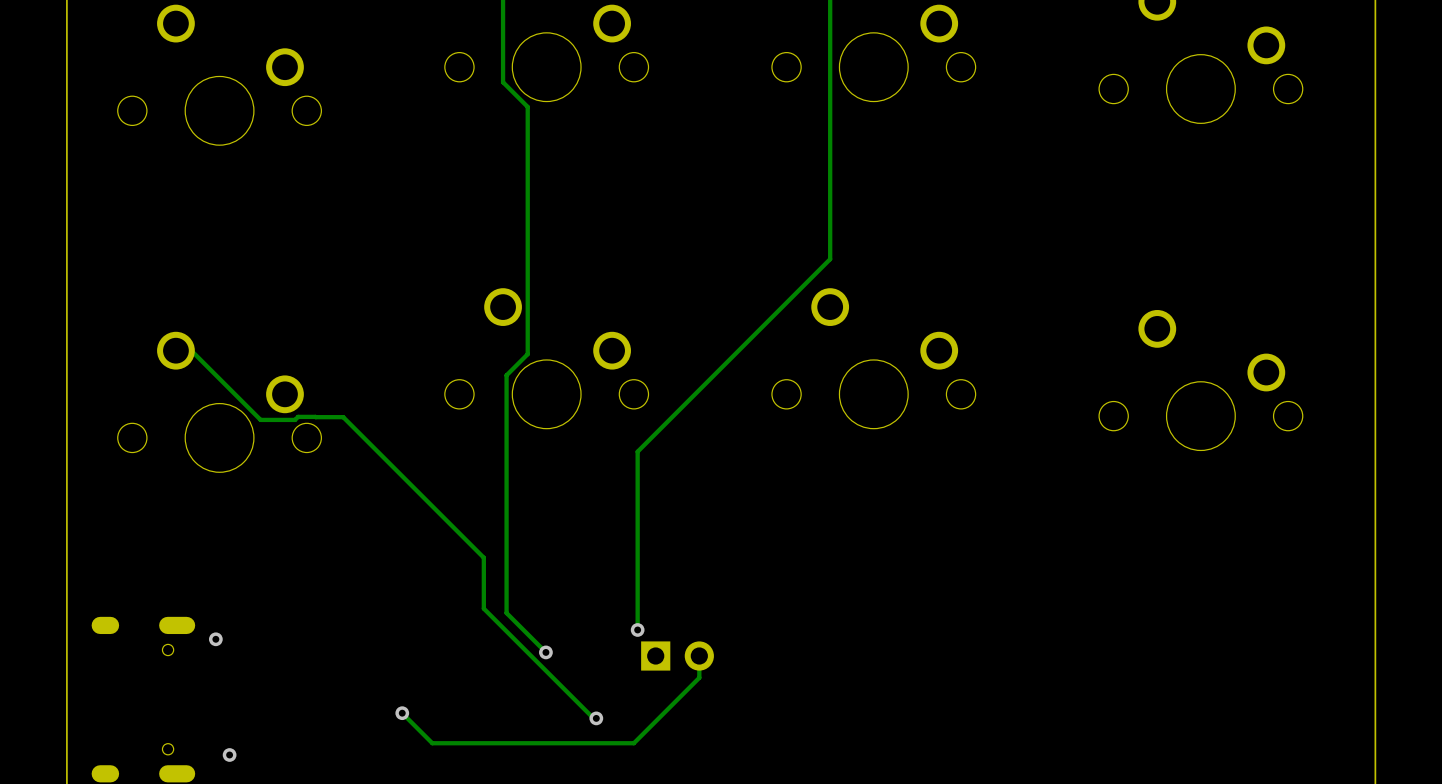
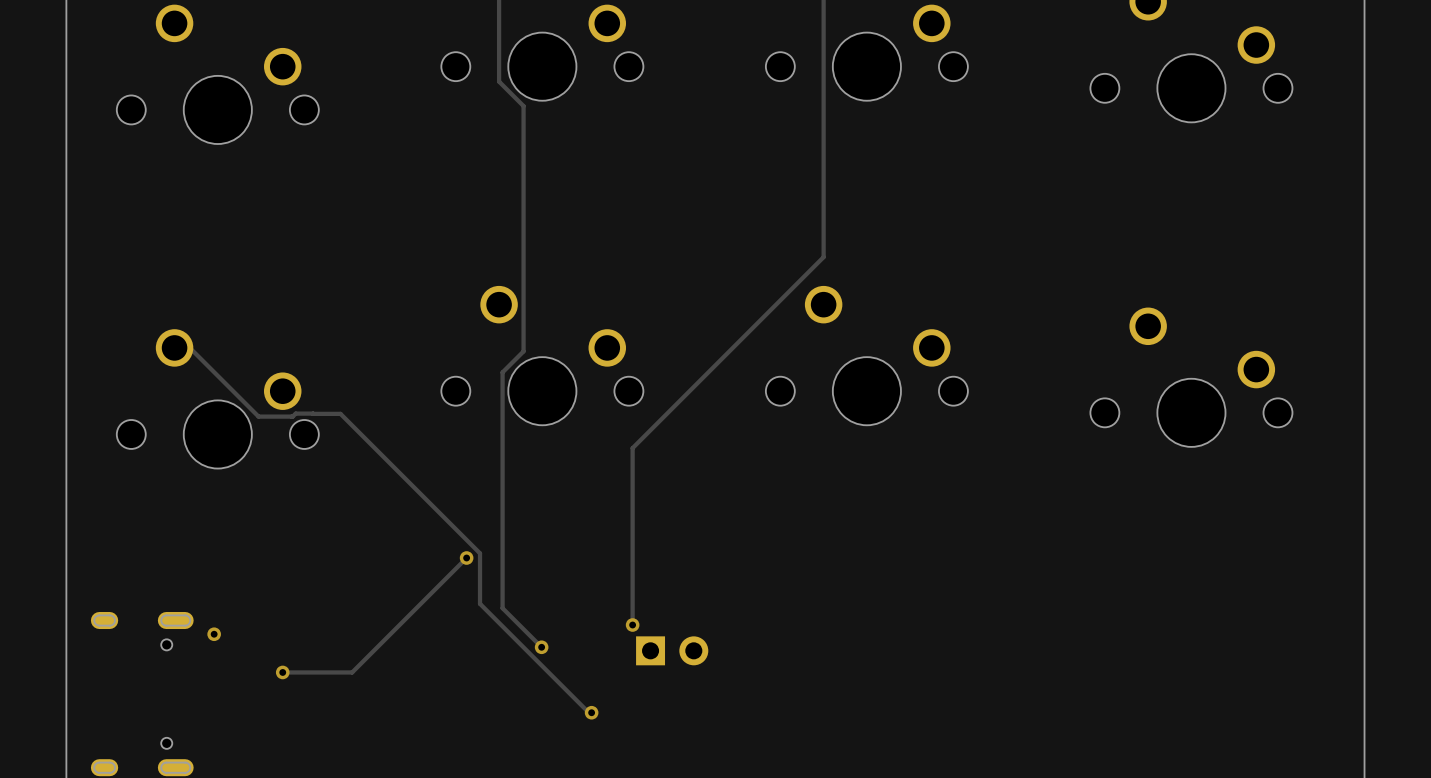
track: none -> (466, 558) (352, 672) (282, 672)
via: none -> (466, 558)
track: (699, 656) (699, 677) (633, 743) (432, 743) (402, 713) -> none
via: none -> (282, 672)
via: (402, 713) -> none
via: (229, 755) -> none

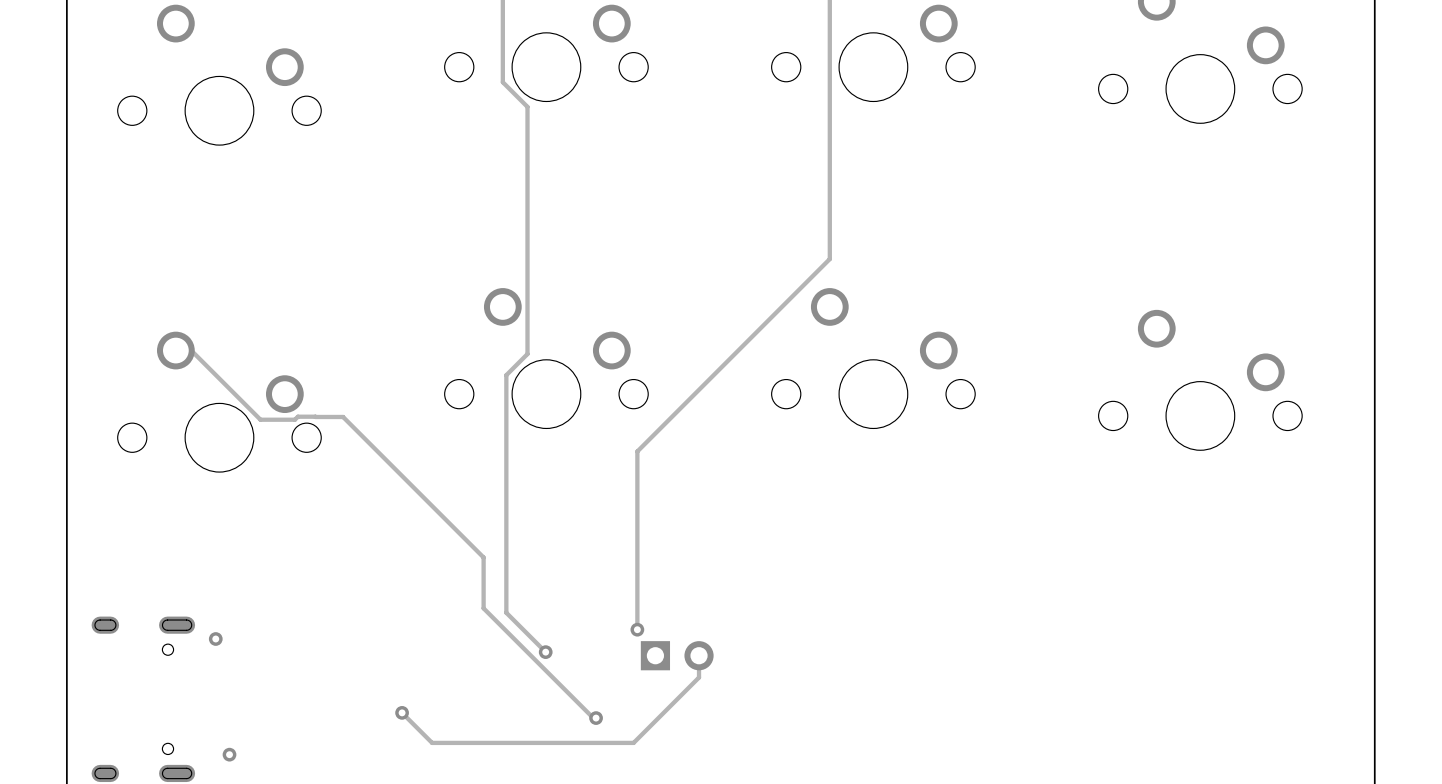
track: (466, 558) (352, 672) (282, 672) -> none
via: (466, 558) -> none
track: none -> (699, 655) (699, 677) (633, 742) (432, 742) (402, 712)
via: (282, 672) -> none
via: none -> (402, 712)
via: none -> (229, 754)

